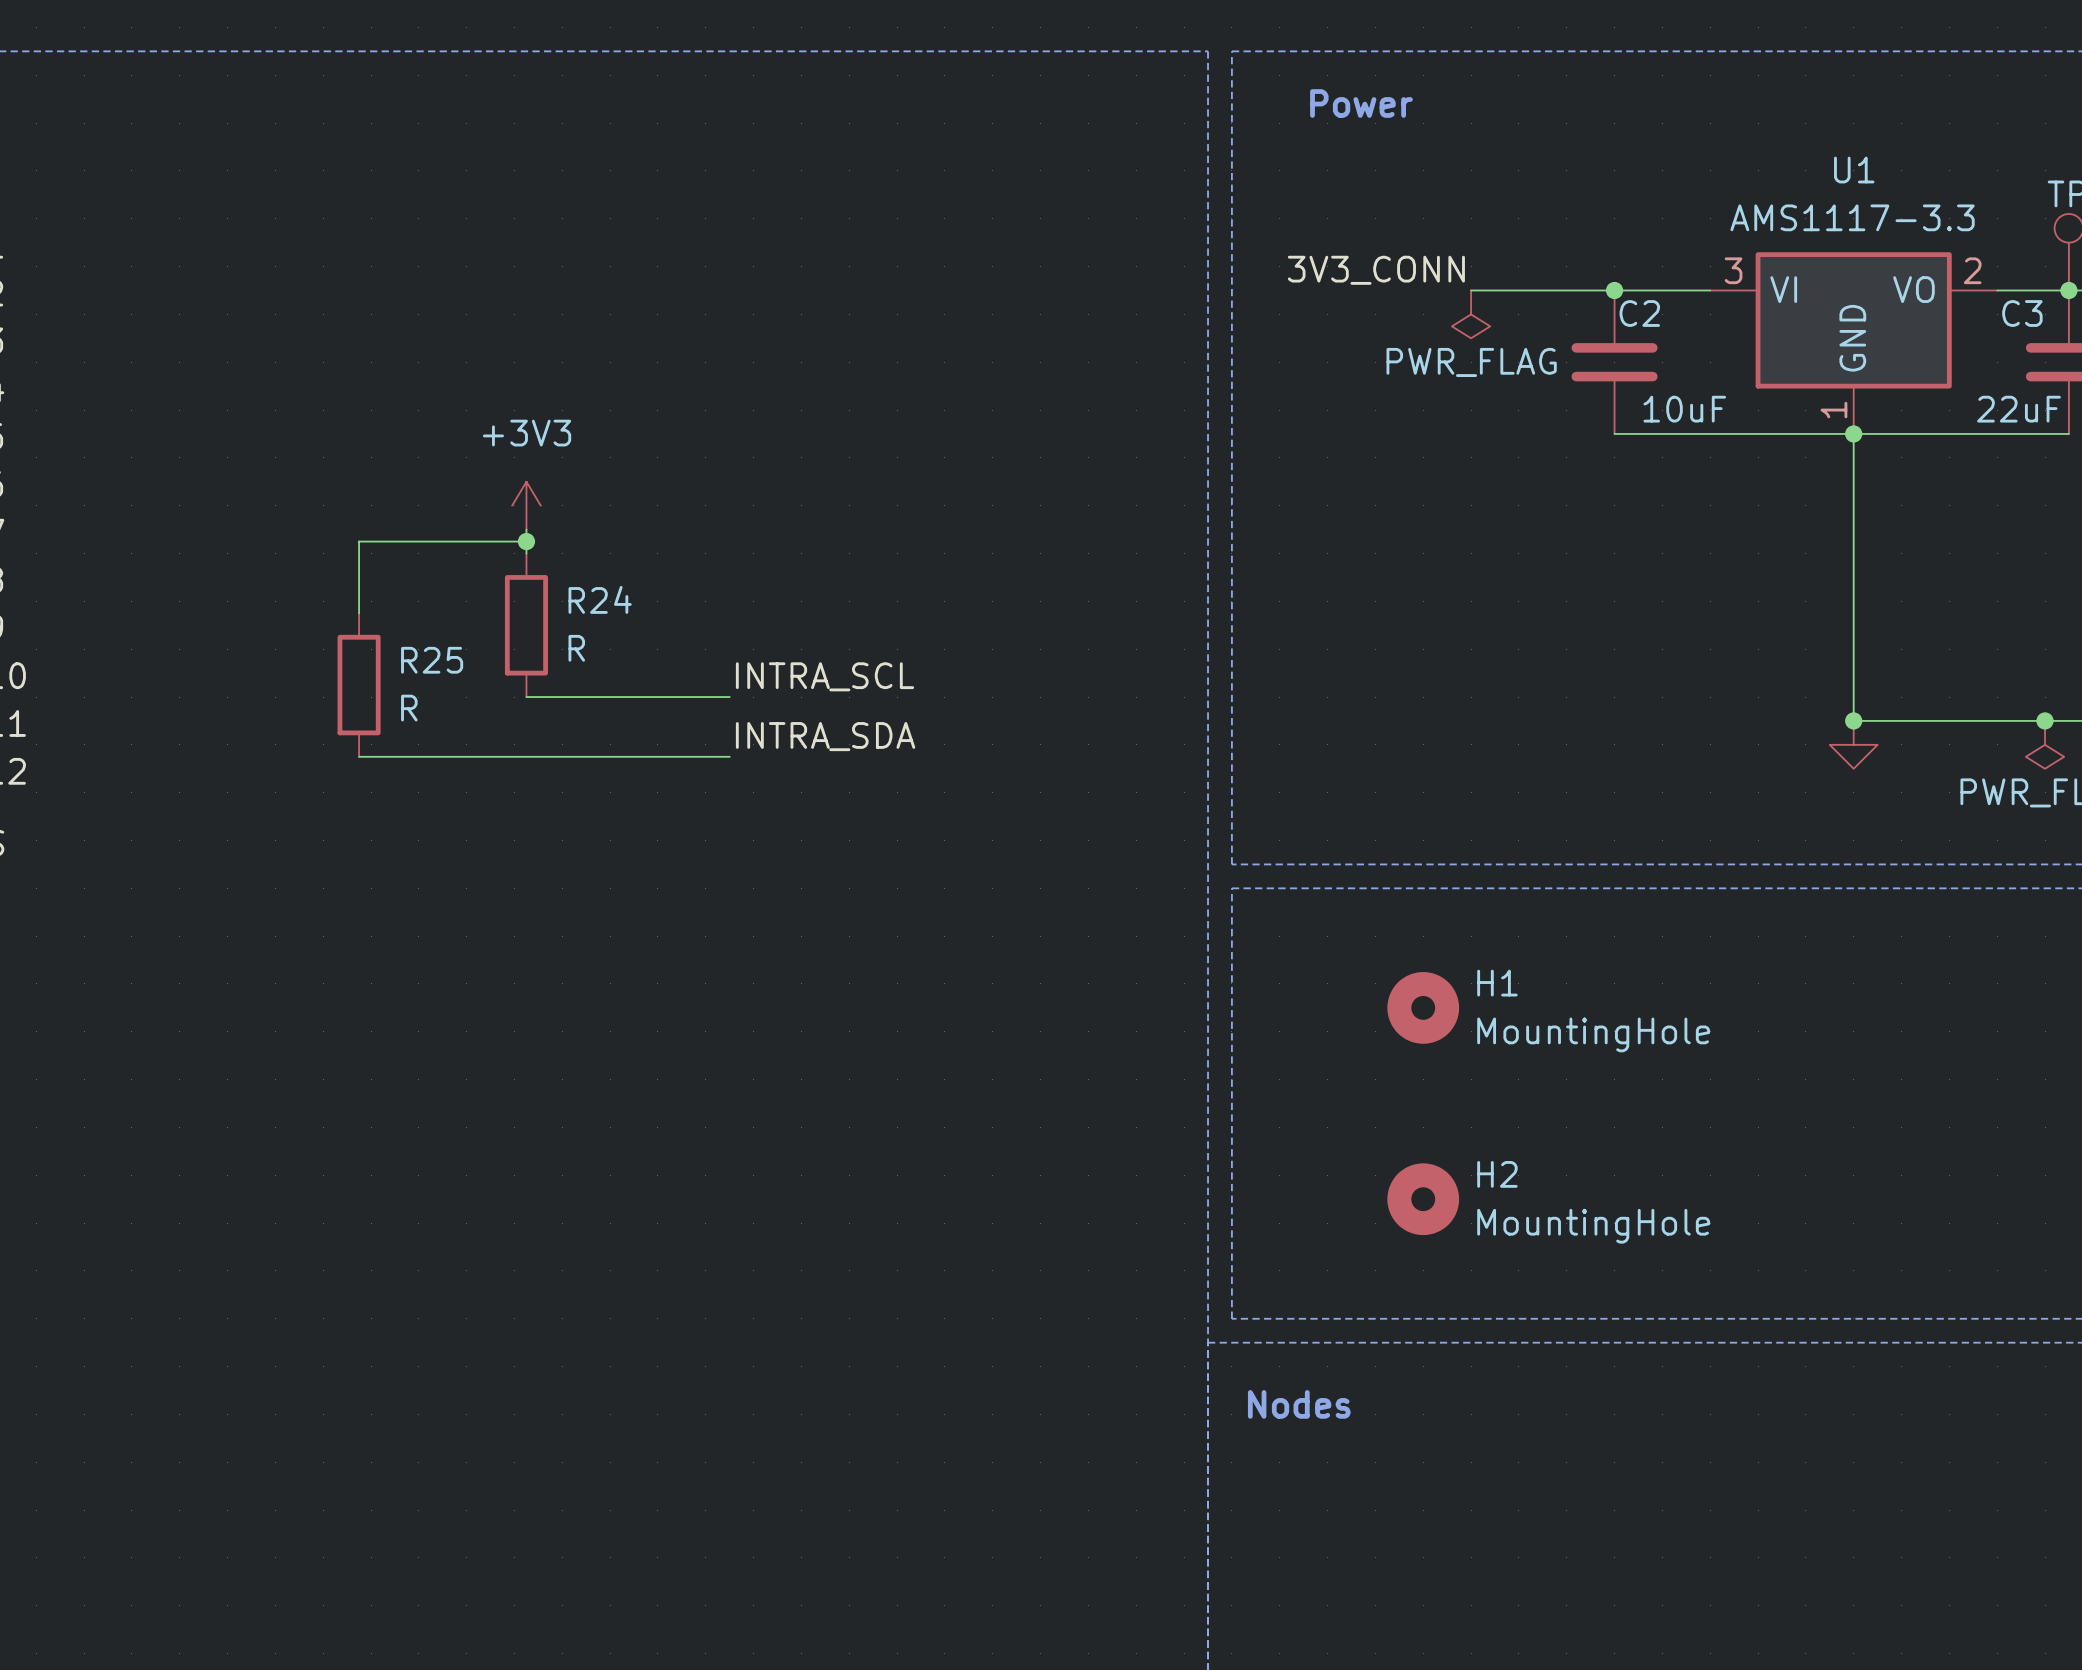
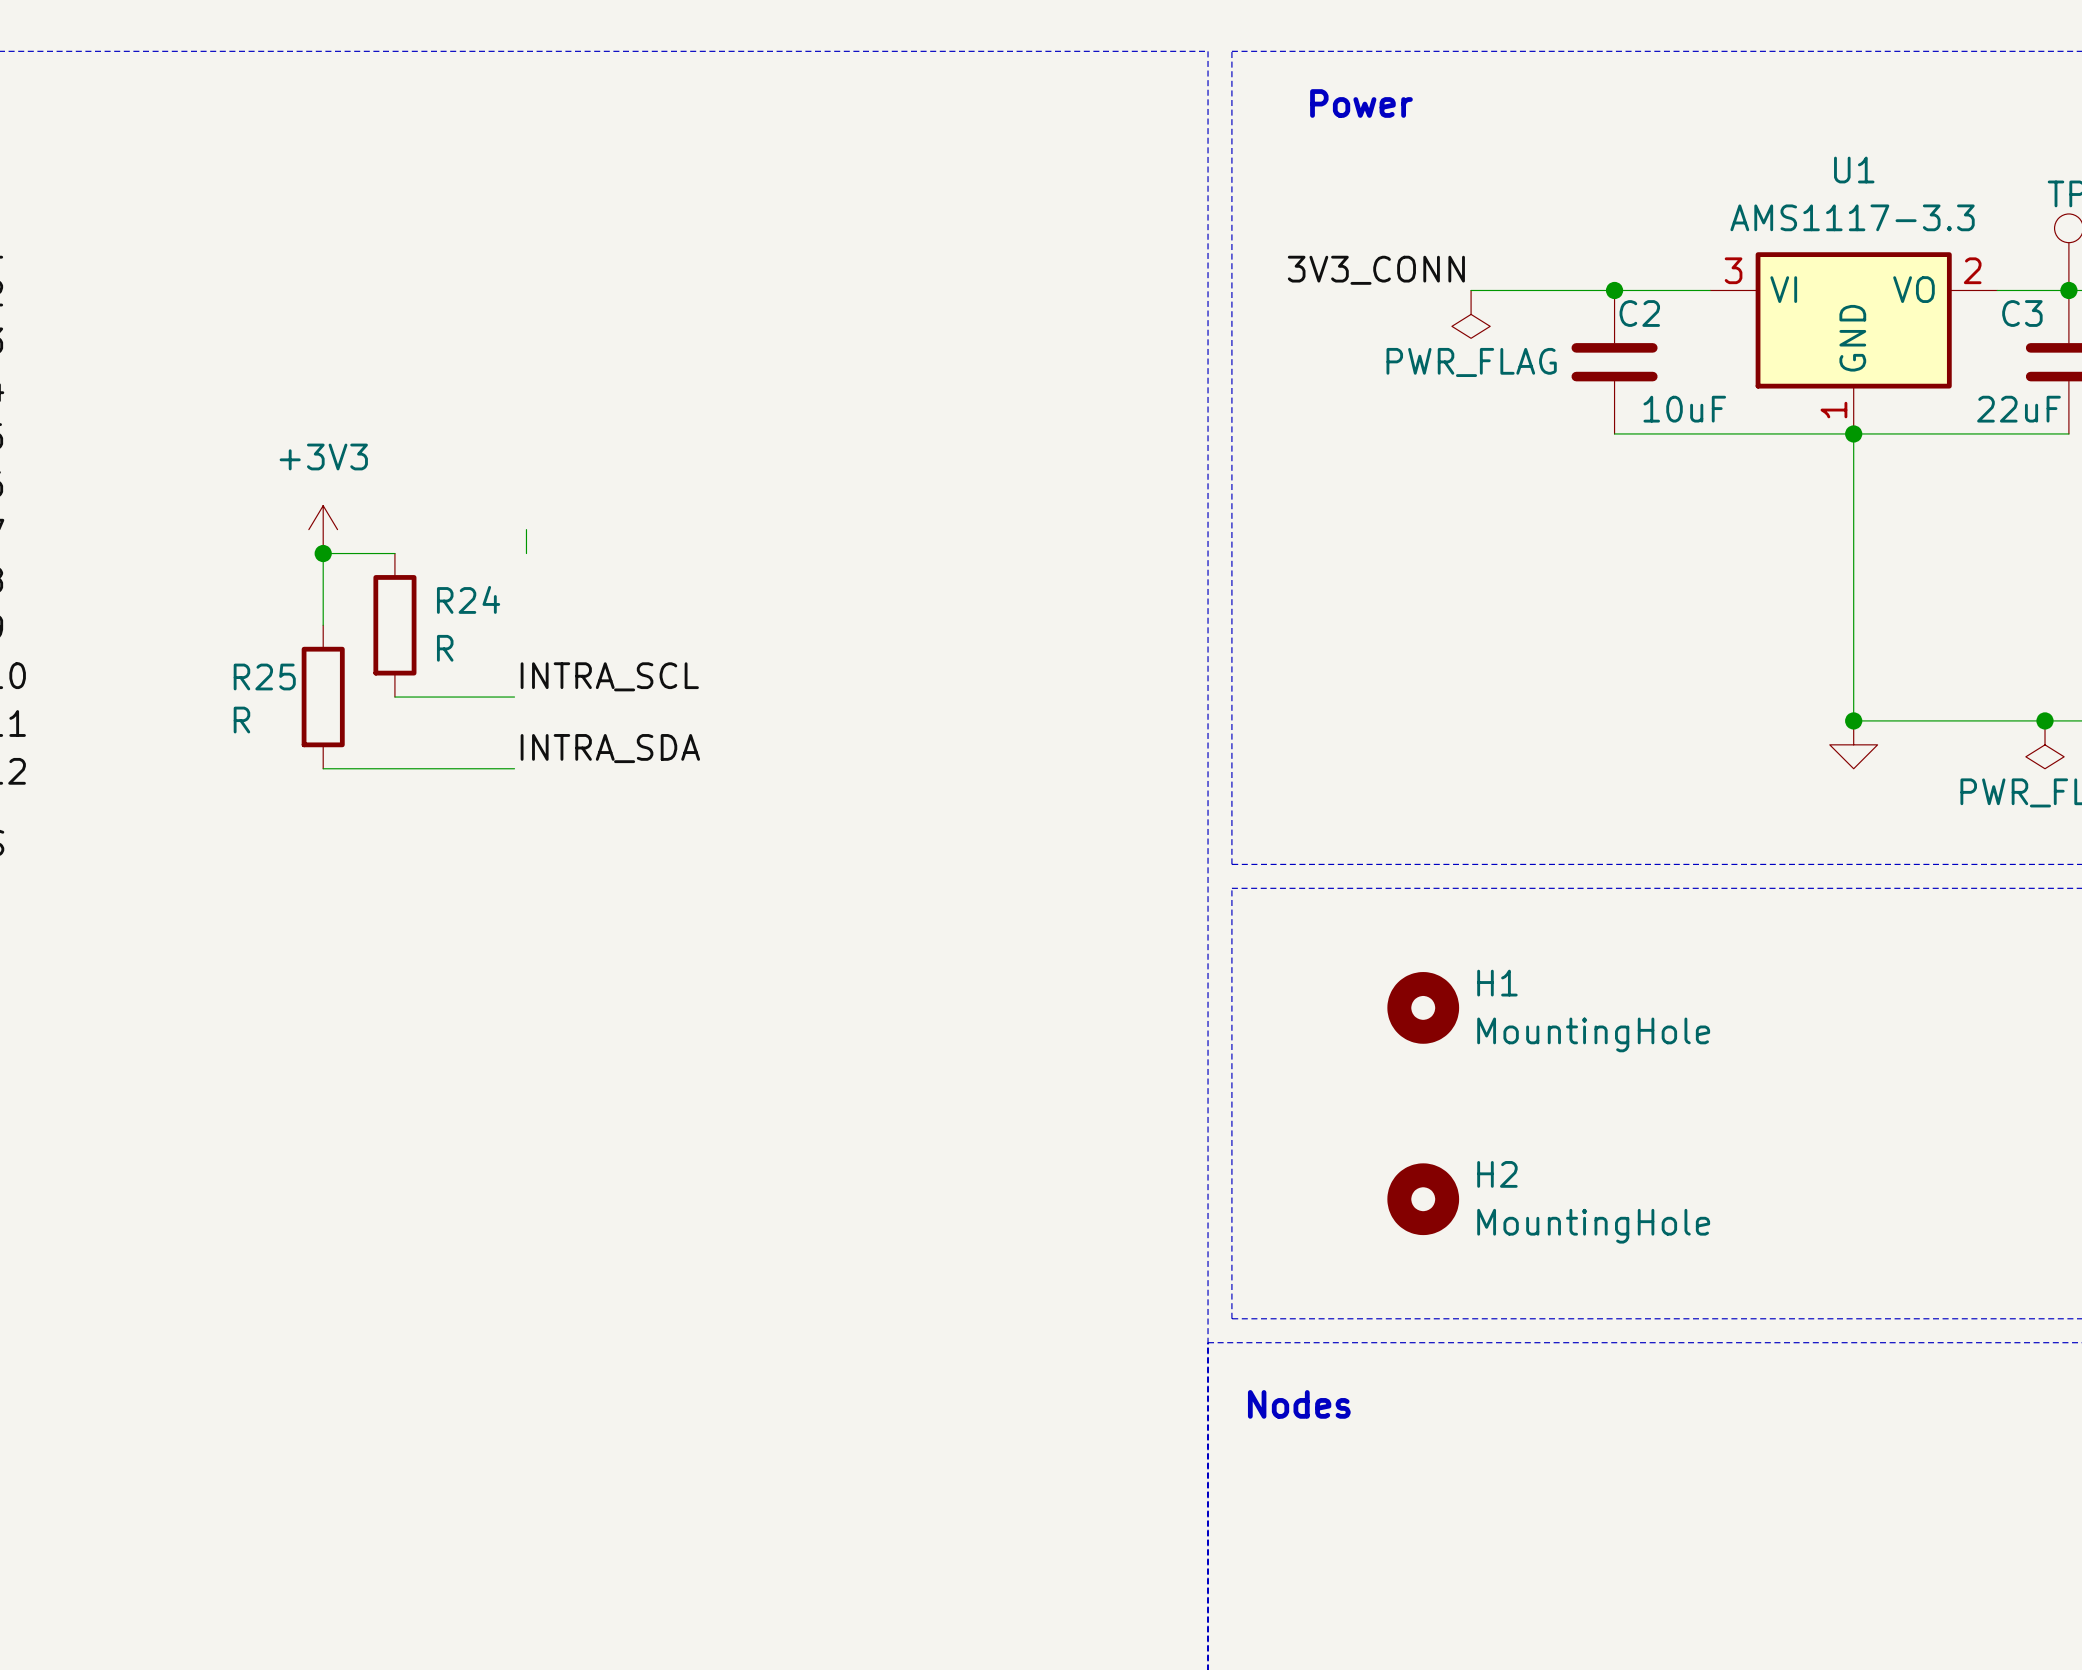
power symbol position: +3V3 (526, 505) -> +3V3 (323, 529)
wire: (526, 541) (359, 541) (359, 613) -> none
junction: (526, 541) -> none
junction: none -> (323, 553)
wire: none -> (394, 553) (323, 553) (323, 625)
R24 position: (526, 625) -> (394, 625)
R25 name position: R25 (432, 660) -> R25 (264, 676)
label position: INTRA_SCL (825, 676) -> INTRA_SCL (609, 676)
R25 position: (359, 685) -> (323, 697)
wire: none -> (394, 697) (514, 697)
wire: (526, 697) (729, 697) -> none
R25 value position: R (409, 708) -> R (241, 720)
label position: INTRA_SDA (825, 736) -> INTRA_SDA (610, 748)
wire: (359, 756) (729, 756) -> none
wire: none -> (323, 768) (514, 768)

